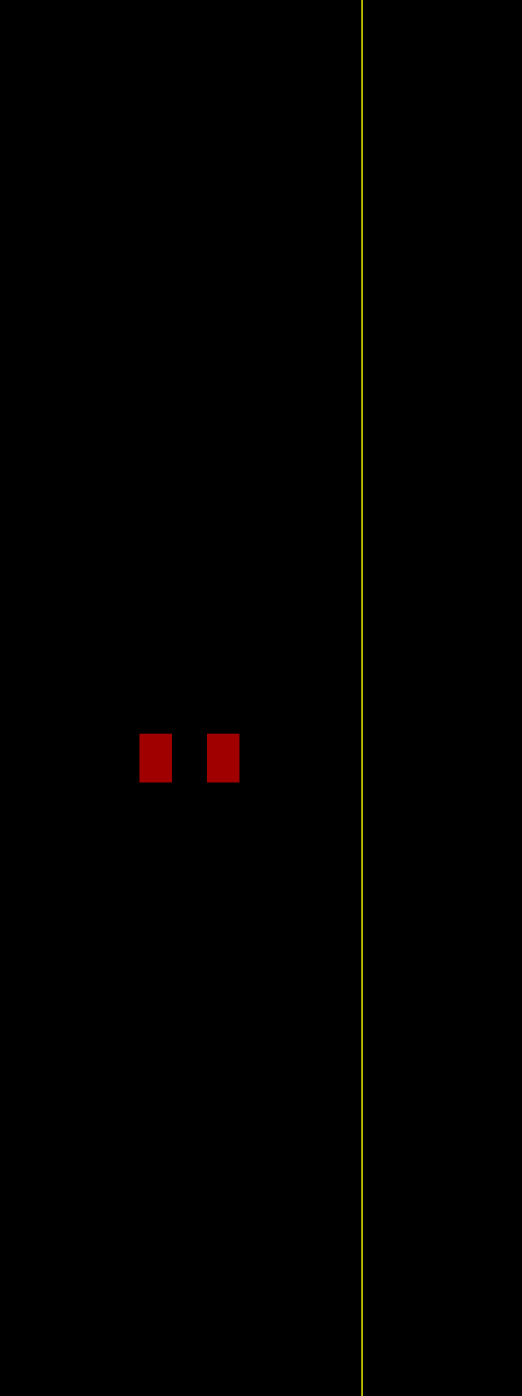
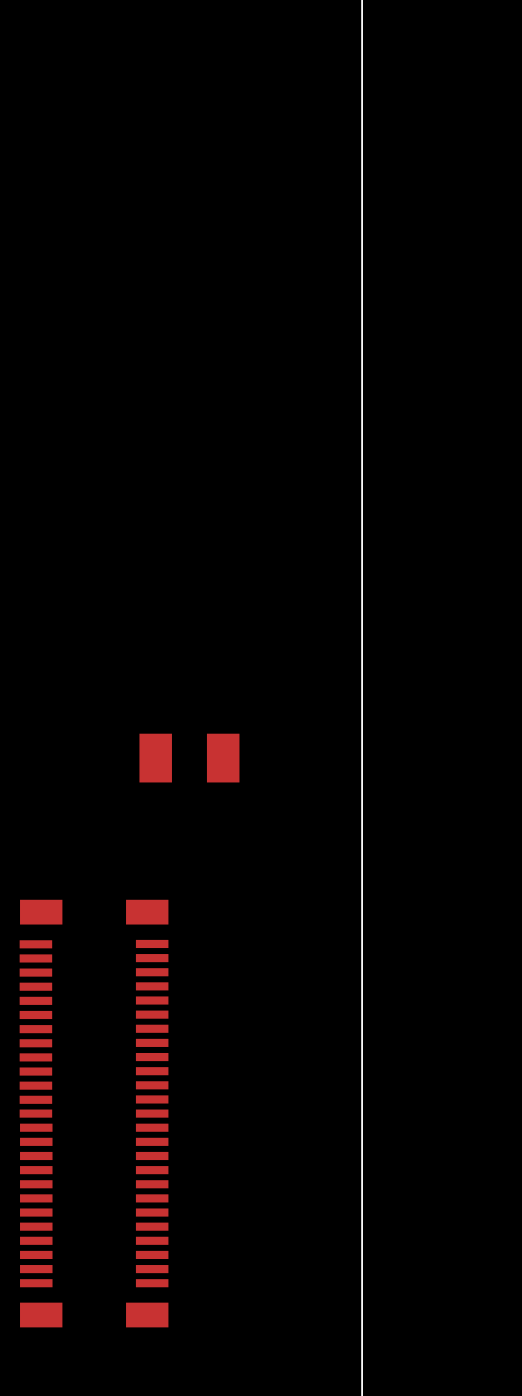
part: none -> (94, 1113)

